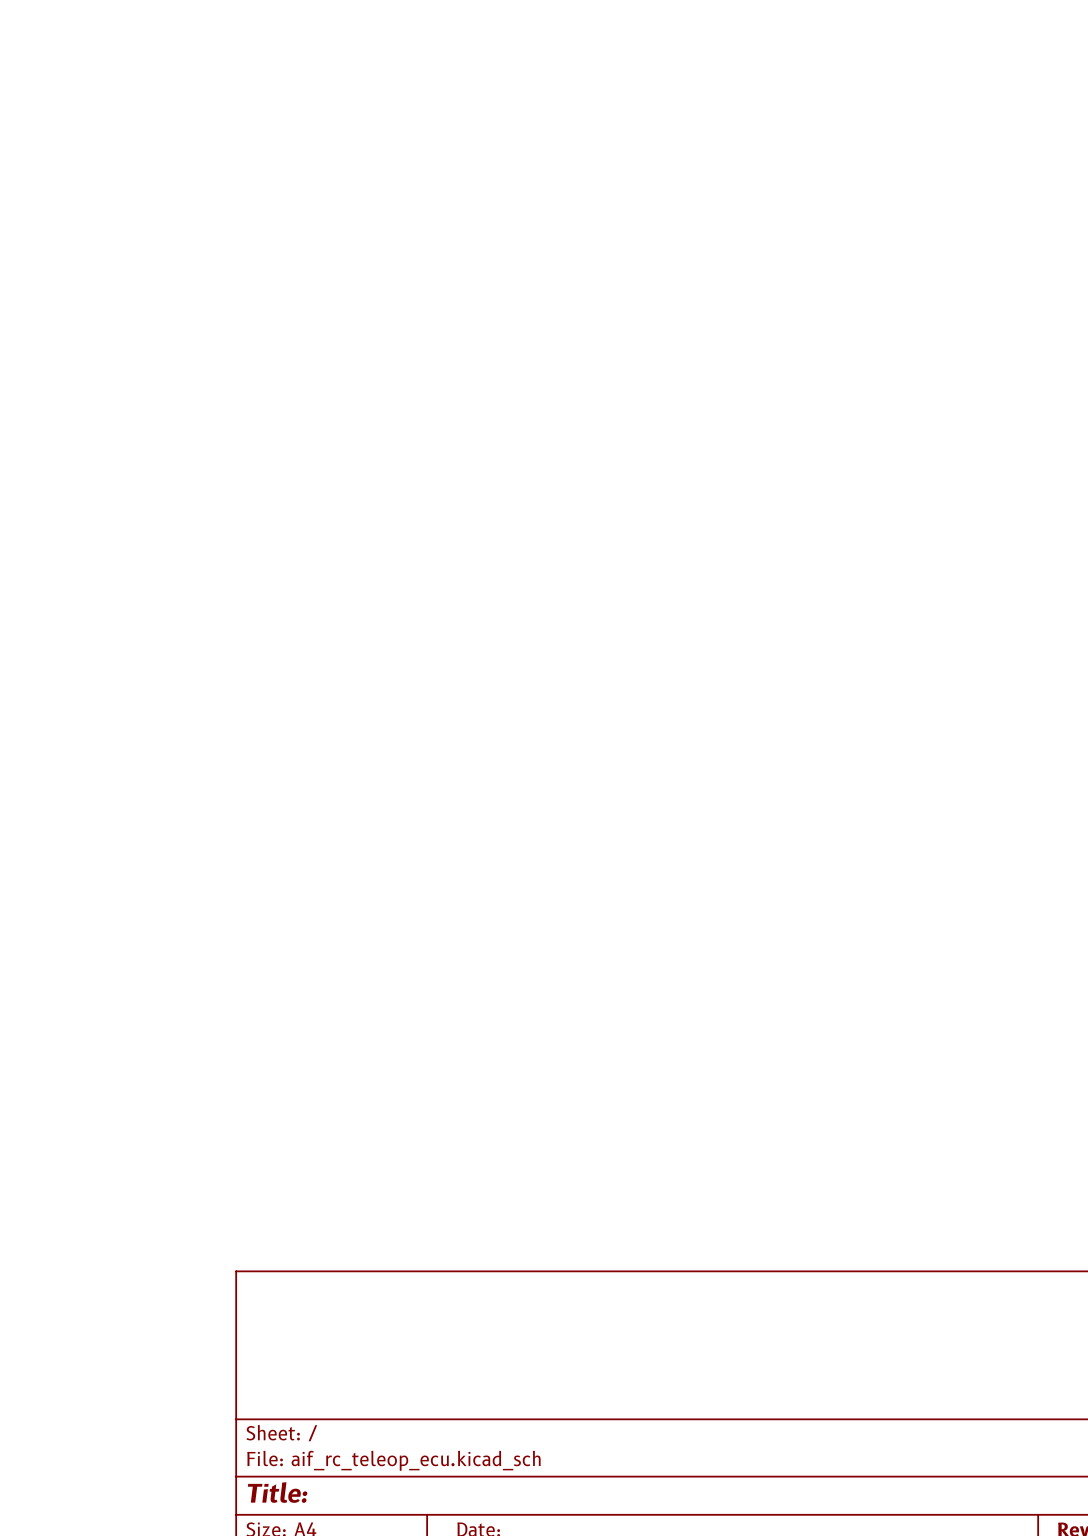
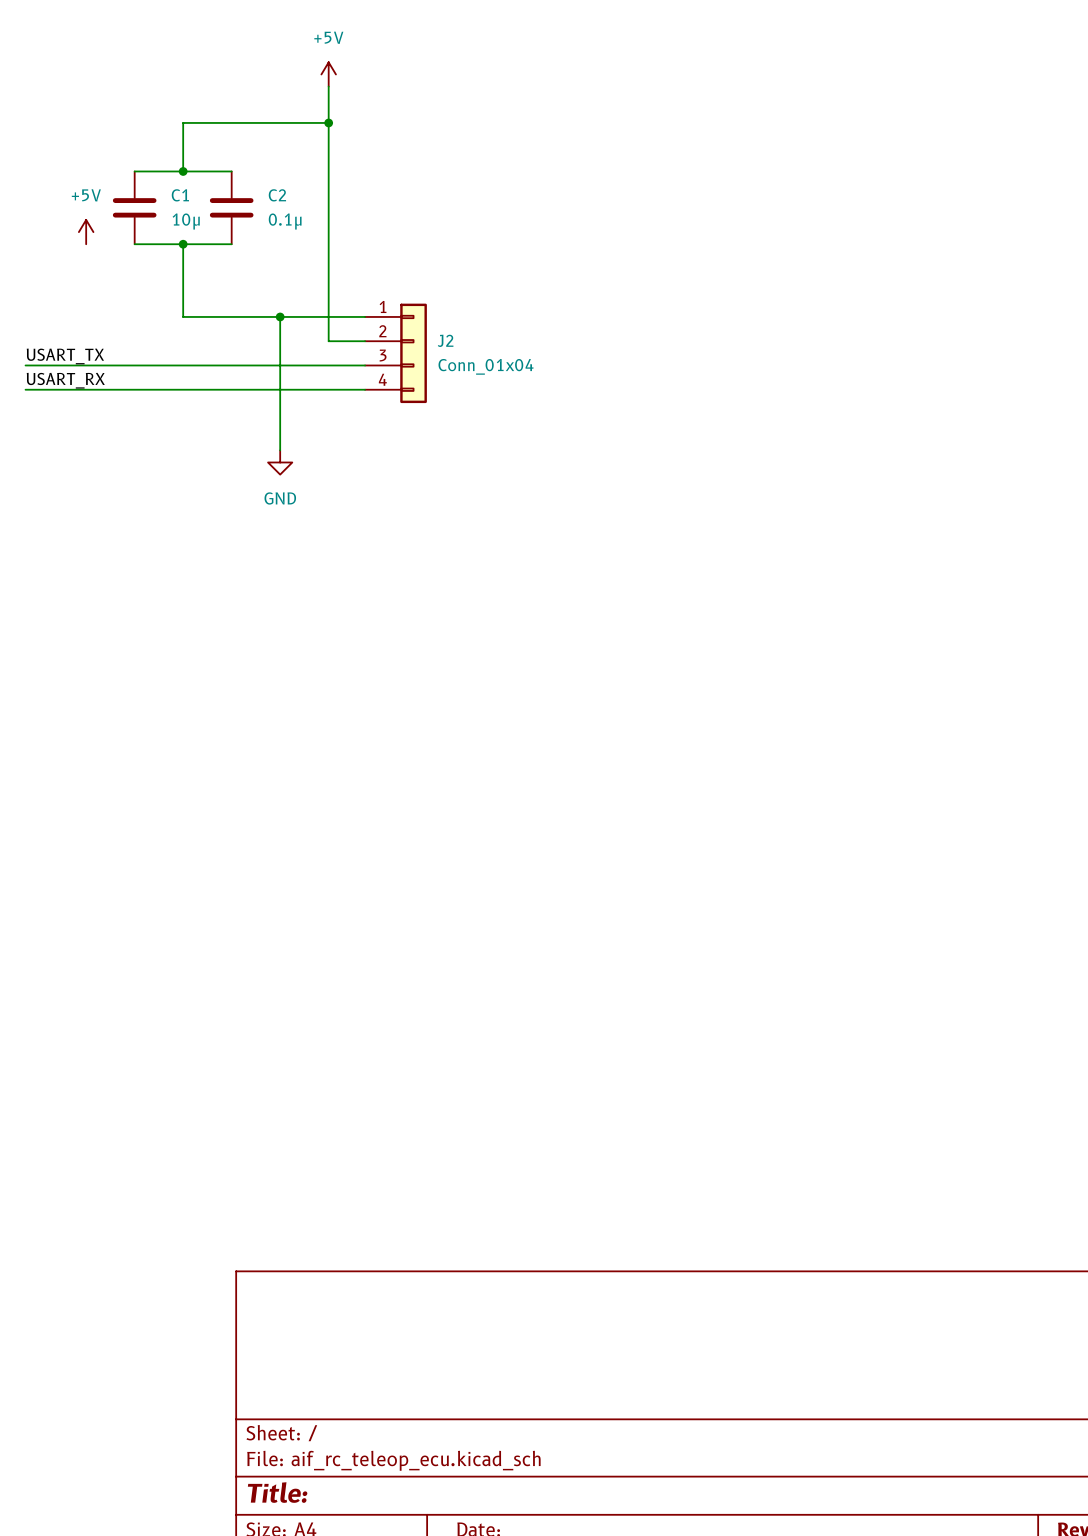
power symbol: none -> +5V (328, 74)
wire: none -> (328, 86) (328, 341) (365, 341)
wire: none -> (328, 122) (183, 122) (183, 171)
junction: none -> (328, 122)
wire: none -> (134, 171) (231, 171)
junction: none -> (183, 171)
C1: none -> 10μ (134, 207)
C2: none -> 0.1μ (231, 207)
power symbol: none -> +5V (86, 232)
wire: none -> (134, 244) (231, 244)
wire: none -> (183, 244) (183, 316) (365, 316)
junction: none -> (183, 244)
wire: none -> (280, 316) (280, 450)
junction: none -> (280, 316)
J2: none -> Conn_01x04 (395, 353)
label: none -> USART_TX (65, 356)
wire: none -> (25, 365) (365, 365)
label: none -> USART_RX (65, 380)
wire: none -> (25, 389) (365, 389)
power symbol: none -> GND (280, 462)

